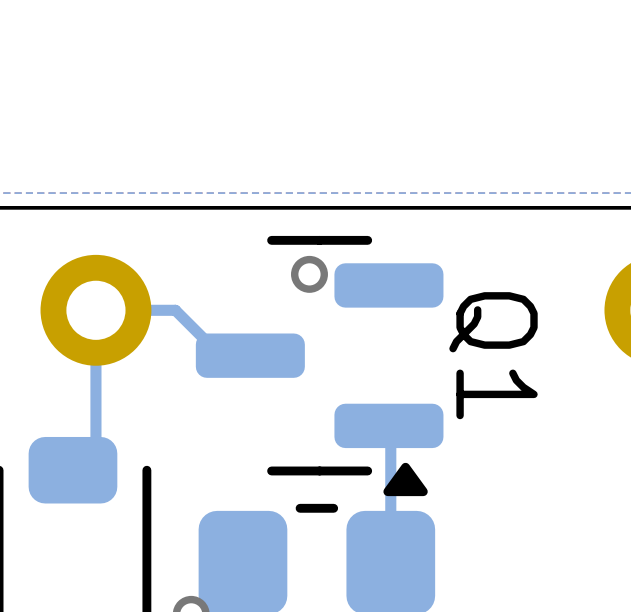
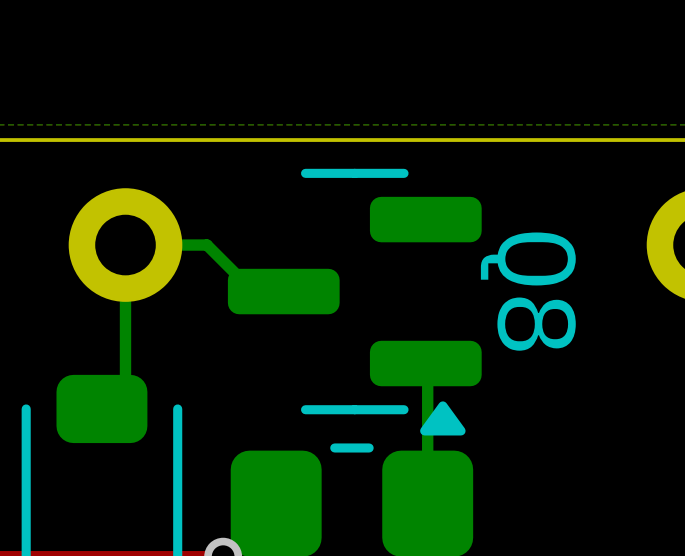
via: (309, 274) -> none
Q1 name: Q1 (493, 355) -> Q8 (528, 291)

